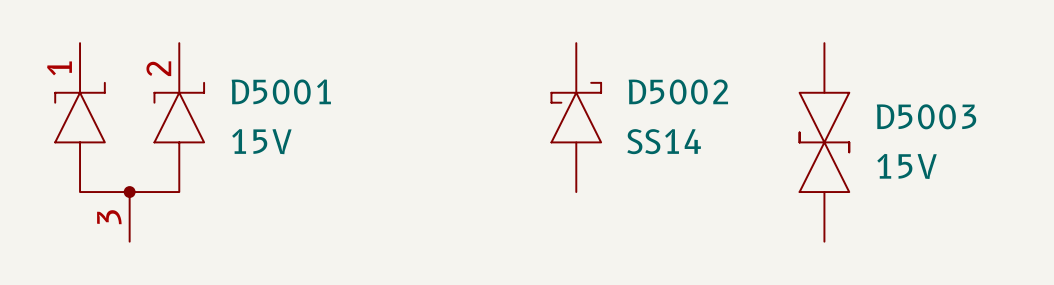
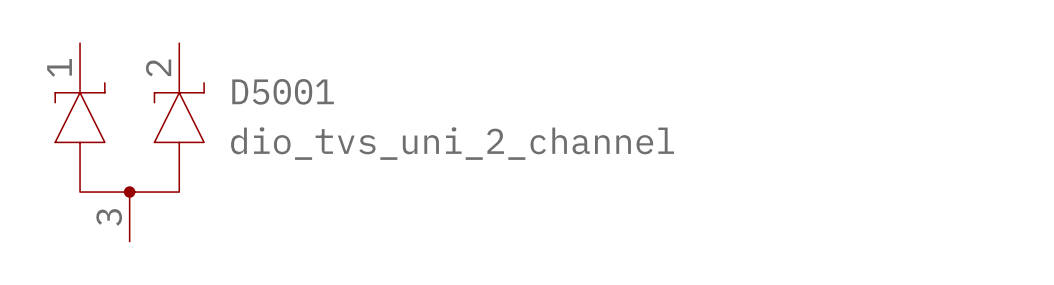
D5002: SS14 (576, 117) -> none
D5001 value: 15V (261, 141) -> dio_tvs_uni_2_channel (452, 143)
D5003: 15V (824, 142) -> none

